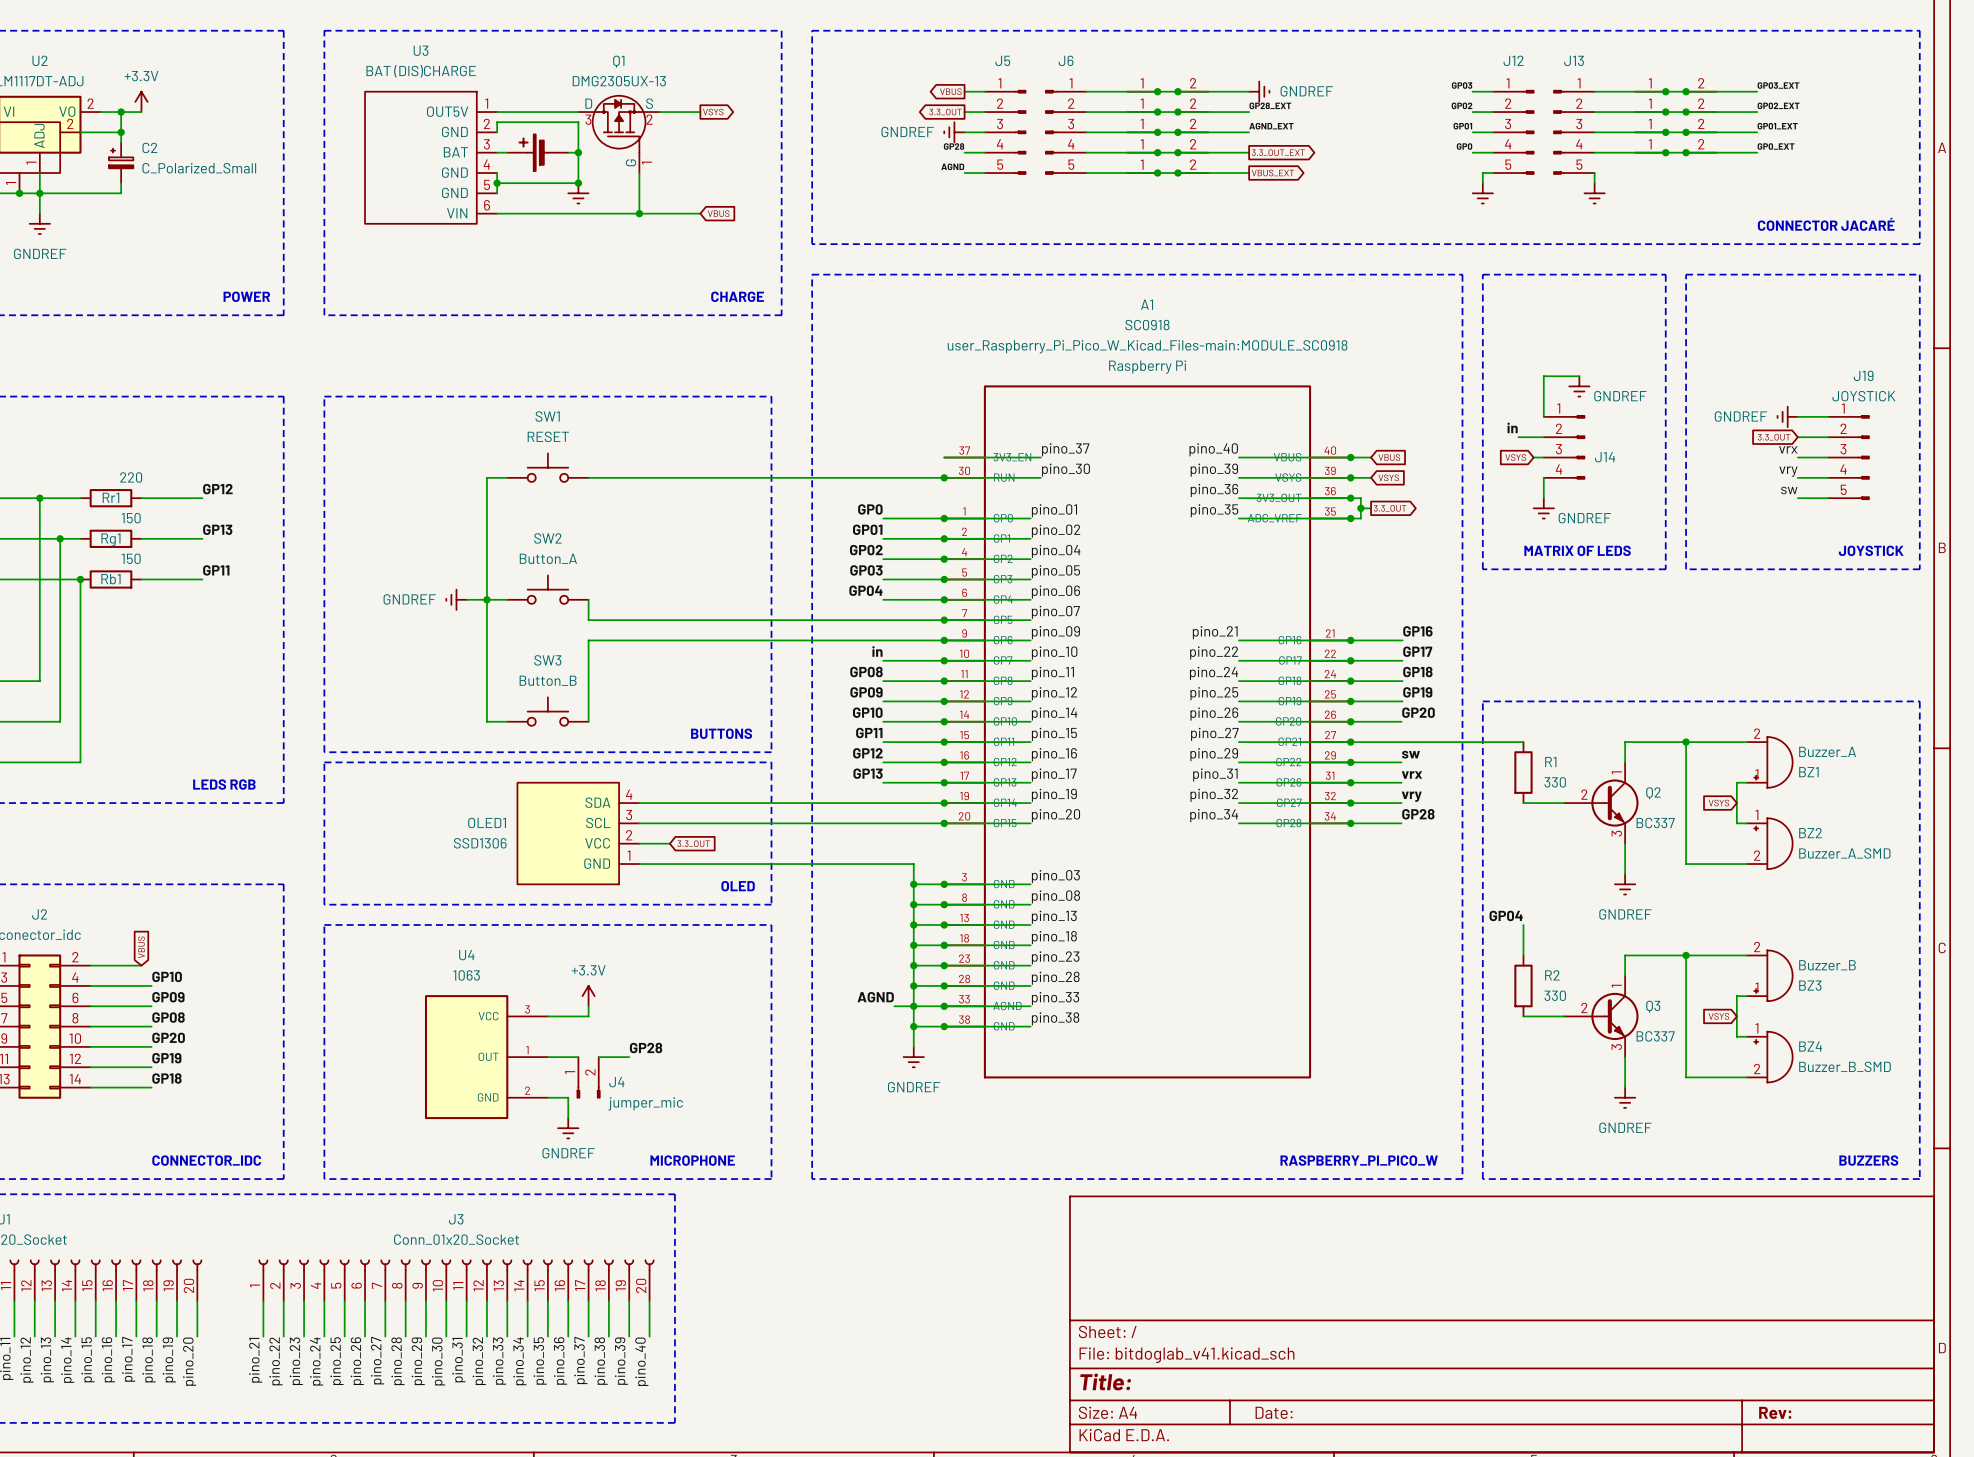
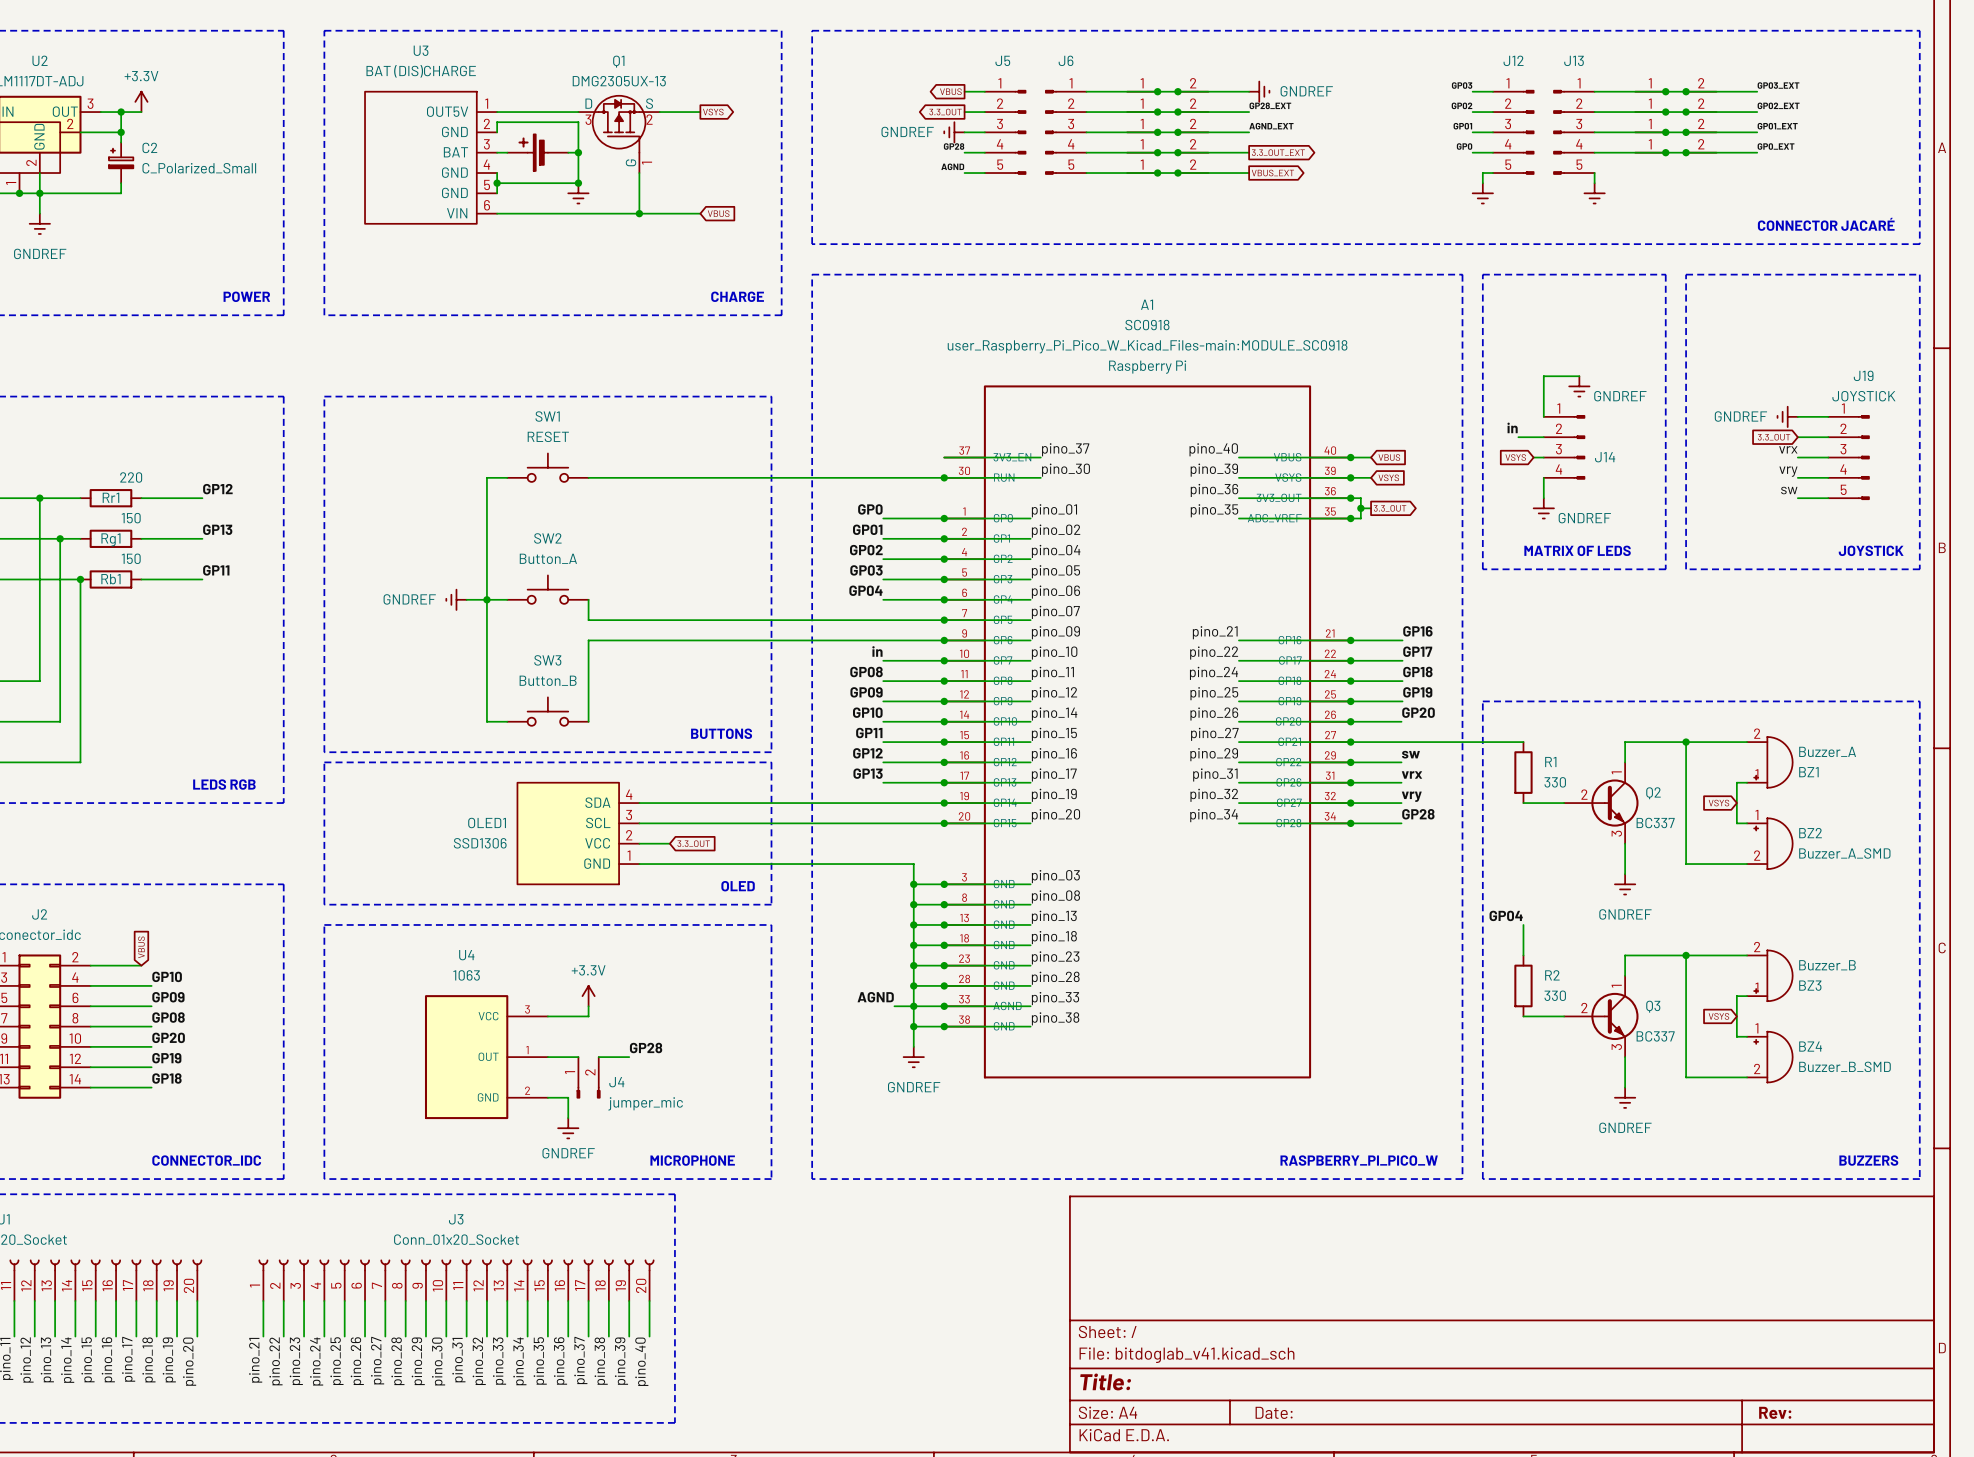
U2 pin number: 2 (90, 103) -> 3 (90, 103)
U2 pin name: VI (8, 111) -> IN (8, 111)
U2 pin name: VO (67, 111) -> OUT (65, 111)
U2 pin name: ADJ (39, 135) -> GND (39, 136)
U2 pin number: 1 (31, 163) -> 2 (31, 162)

